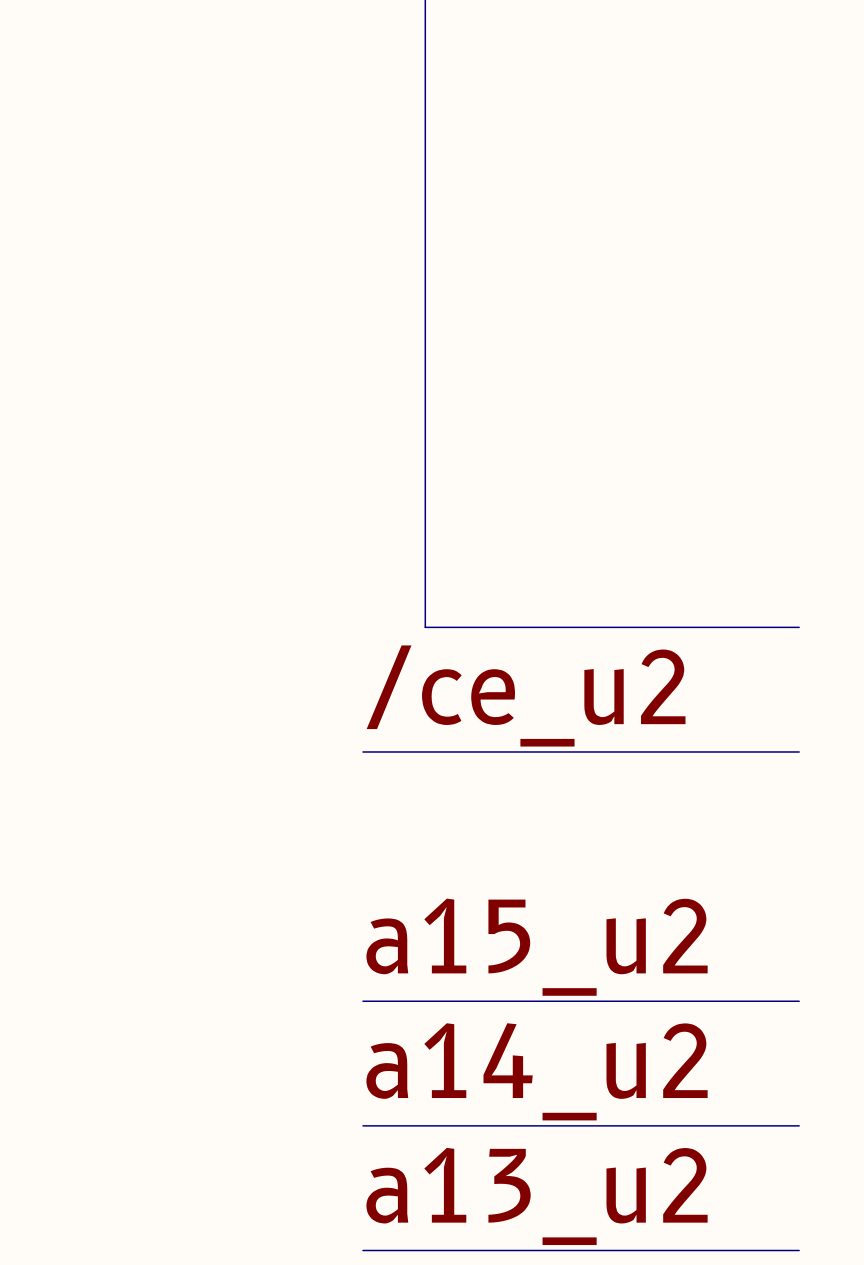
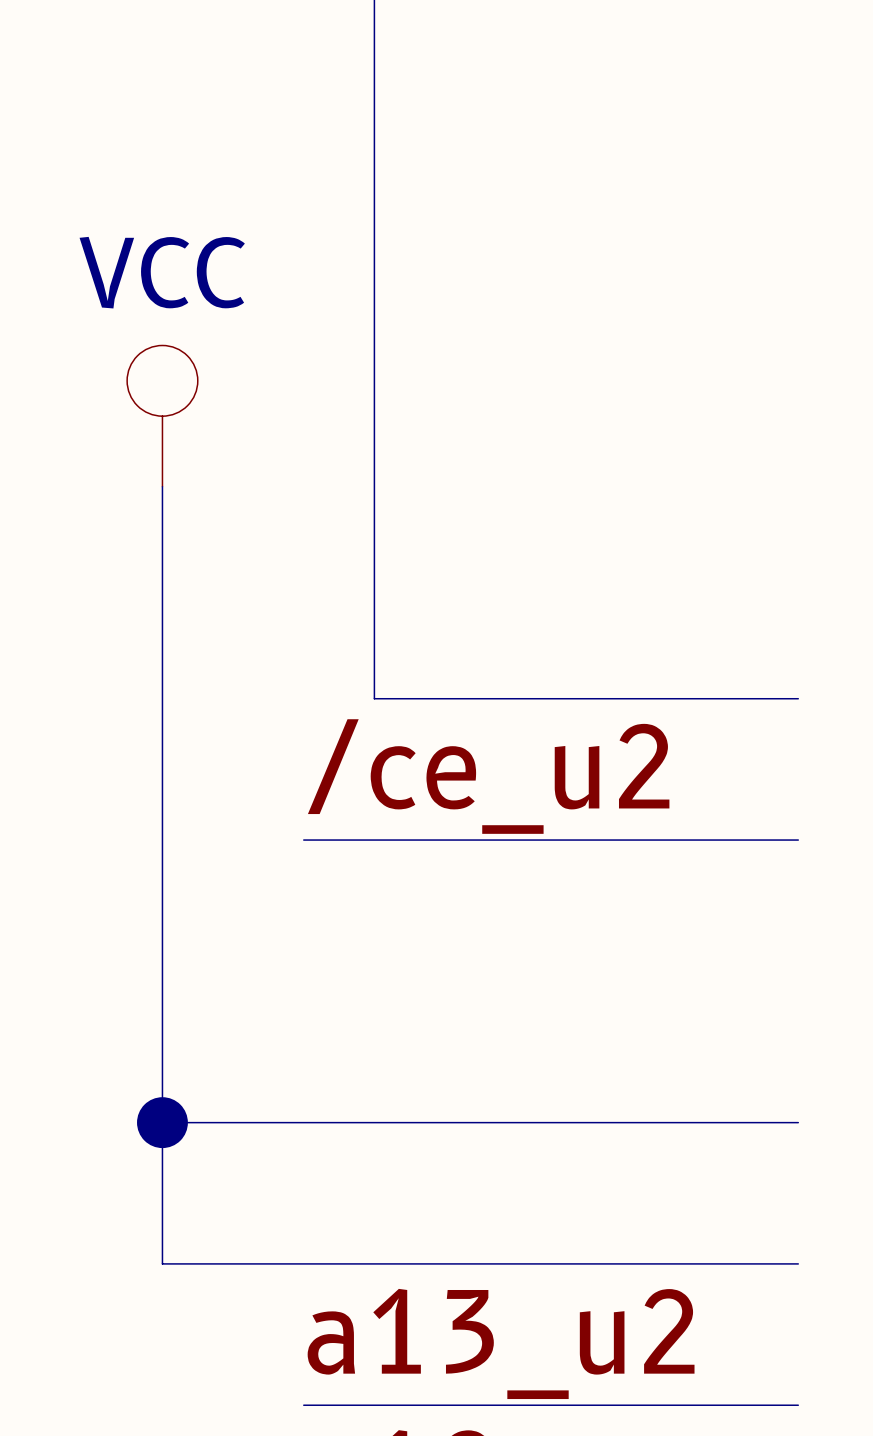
power symbol: none -> VCC (162, 416)
wire: none -> (162, 486) (162, 1263) (303, 1263)
label: a15_u2 (537, 947) -> none
wire: none -> (162, 1122) (303, 1122)
junction: none -> (162, 1122)
label: a14_u2 (537, 1071) -> none

